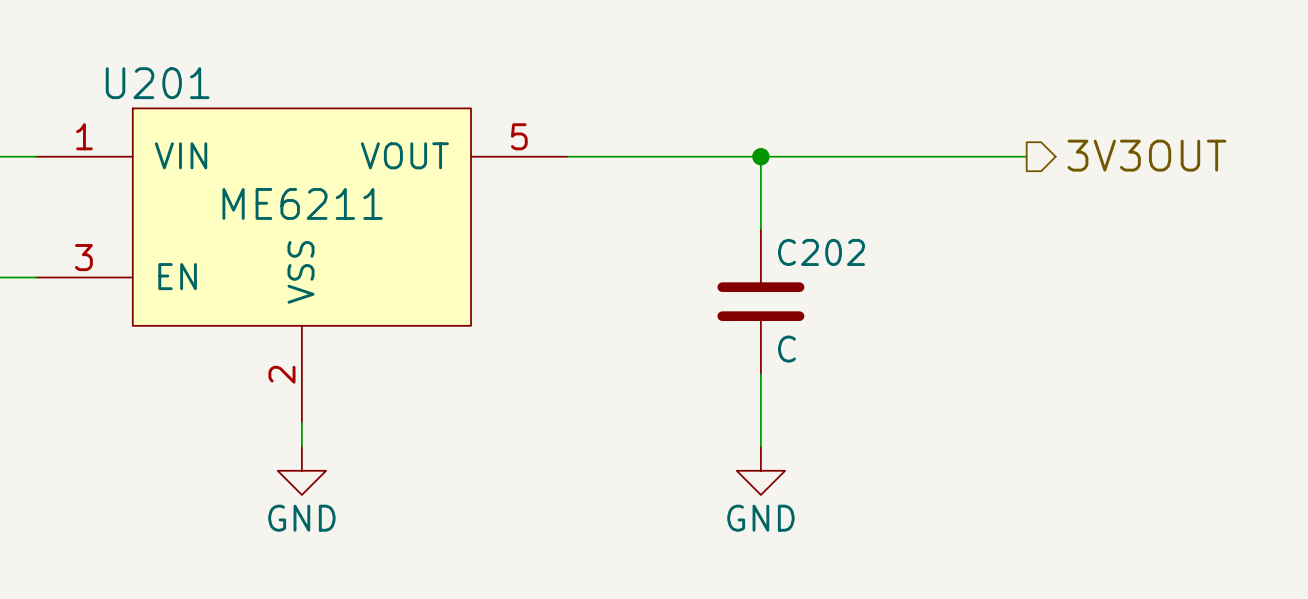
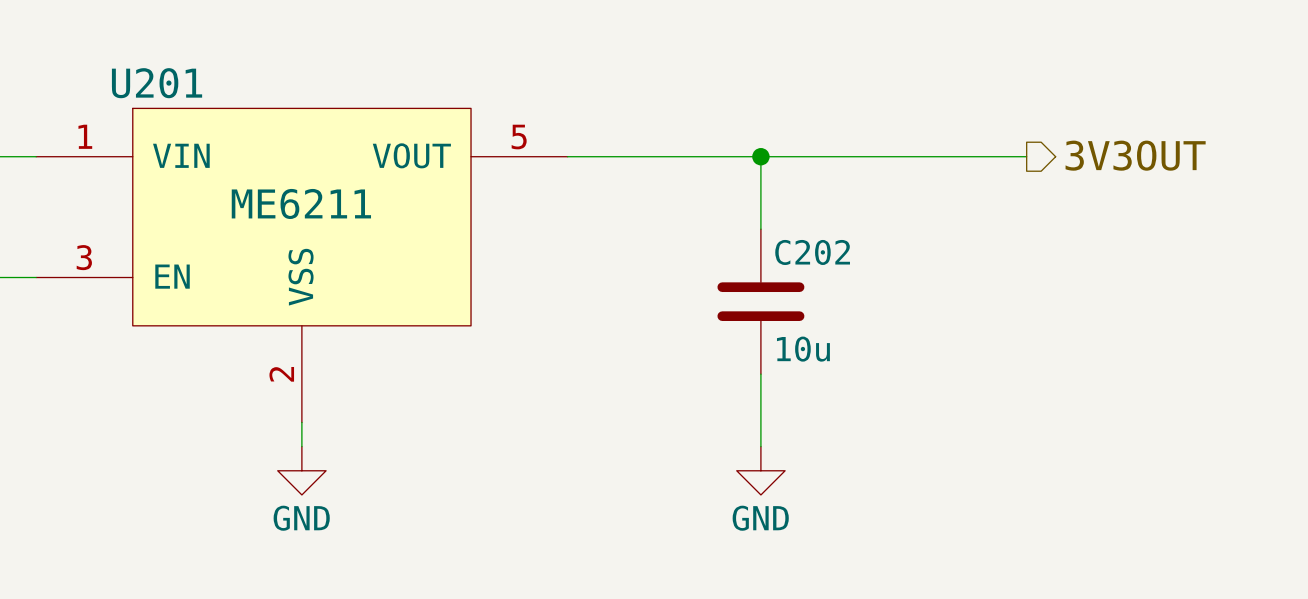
C202 value: C (786, 349) -> 10u (803, 349)

